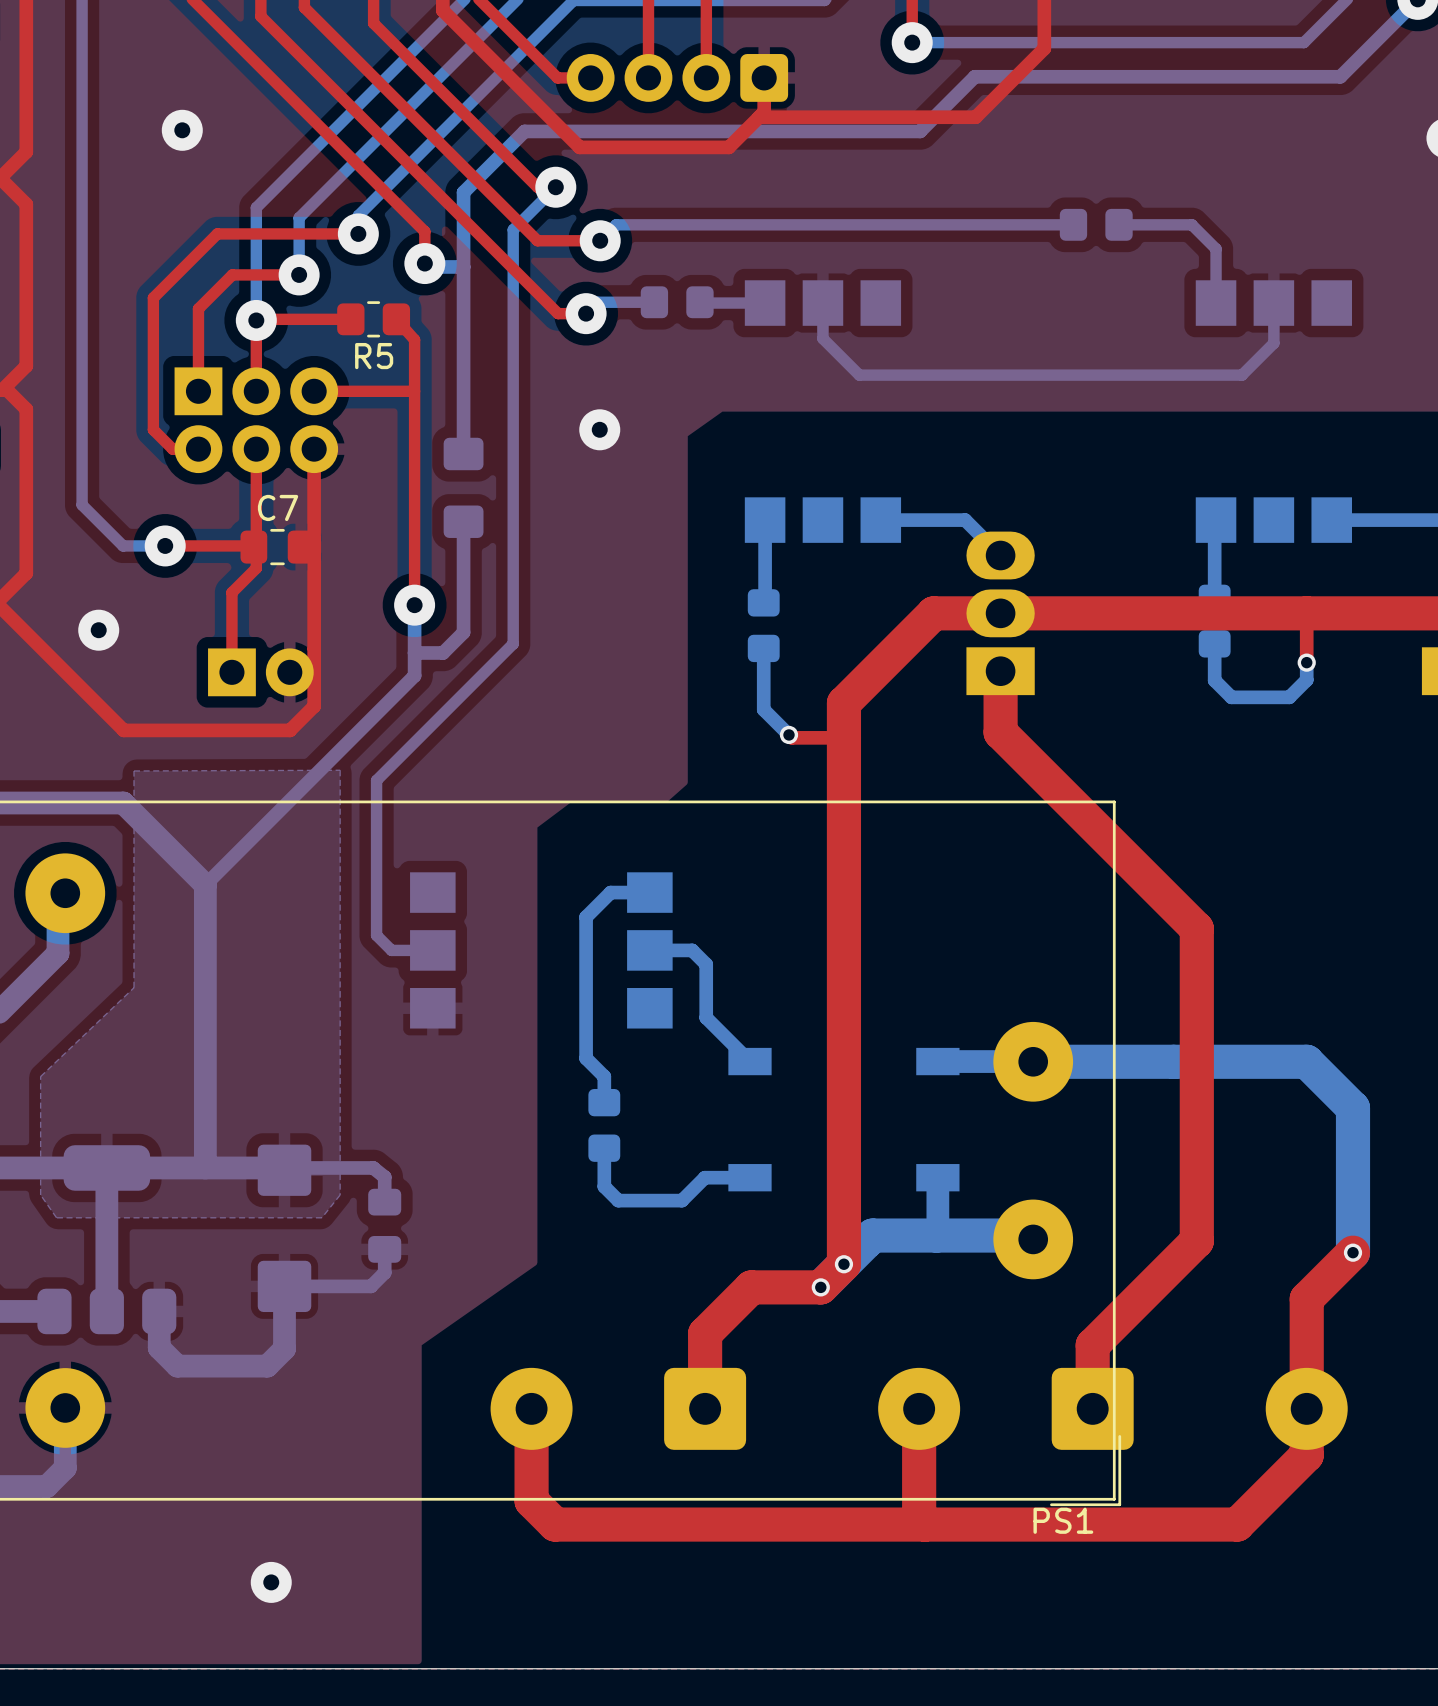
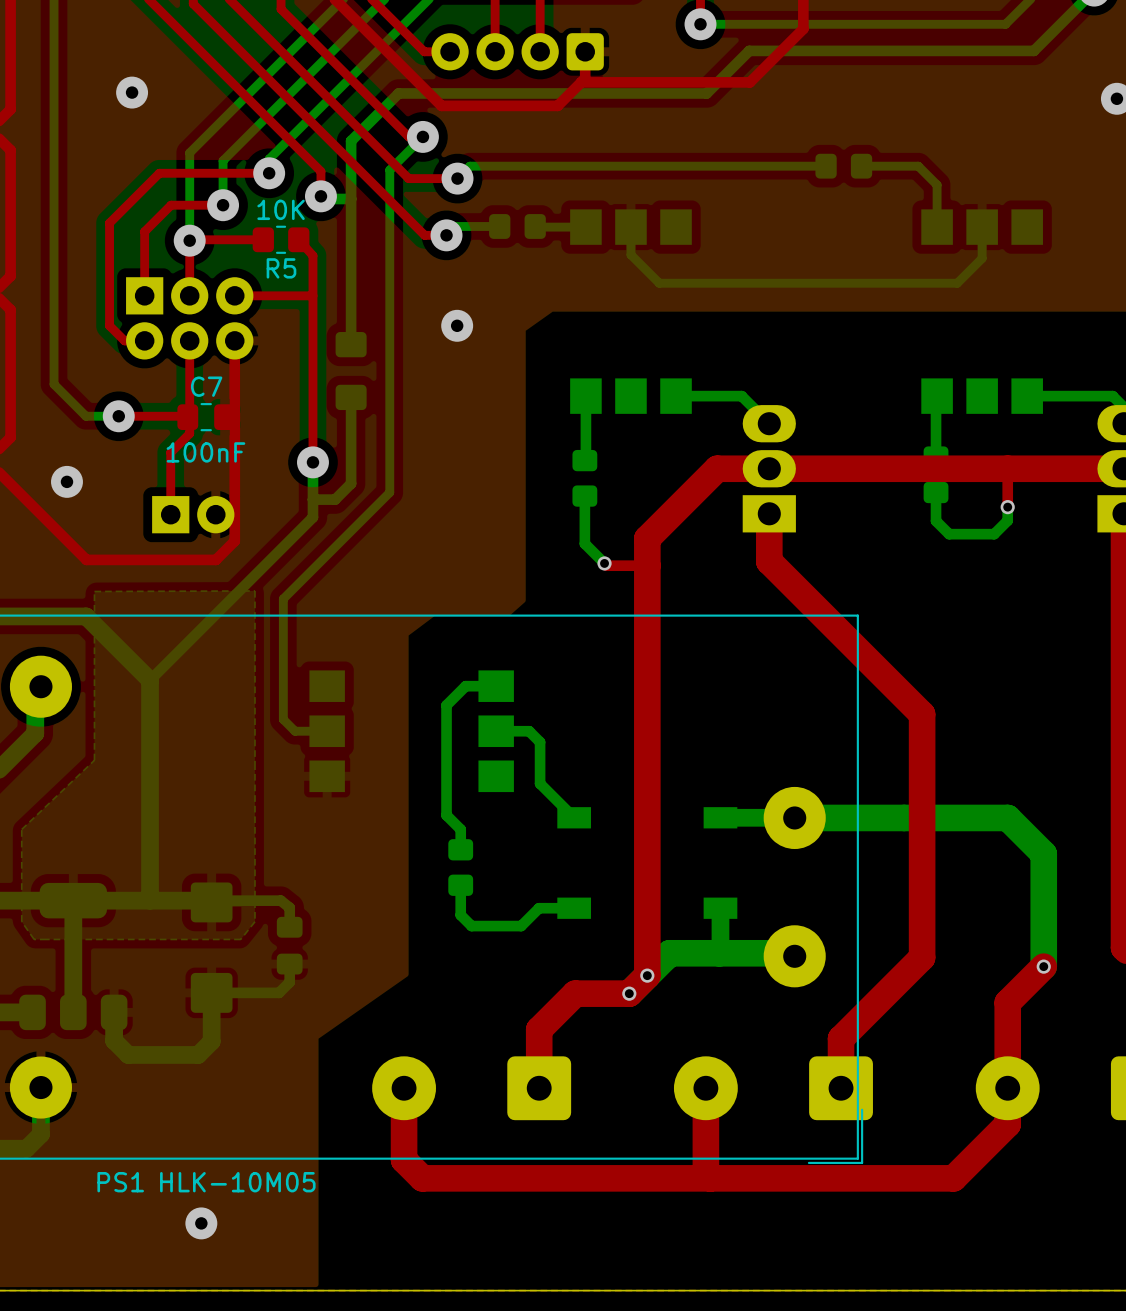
R5 value: none -> 10K (281, 209)
C7 value: none -> 100nF (205, 452)
PS1 name position: PS1 (1063, 1520) -> PS1 (120, 1182)
PS1 value: none -> HLK-10M05 (237, 1182)

